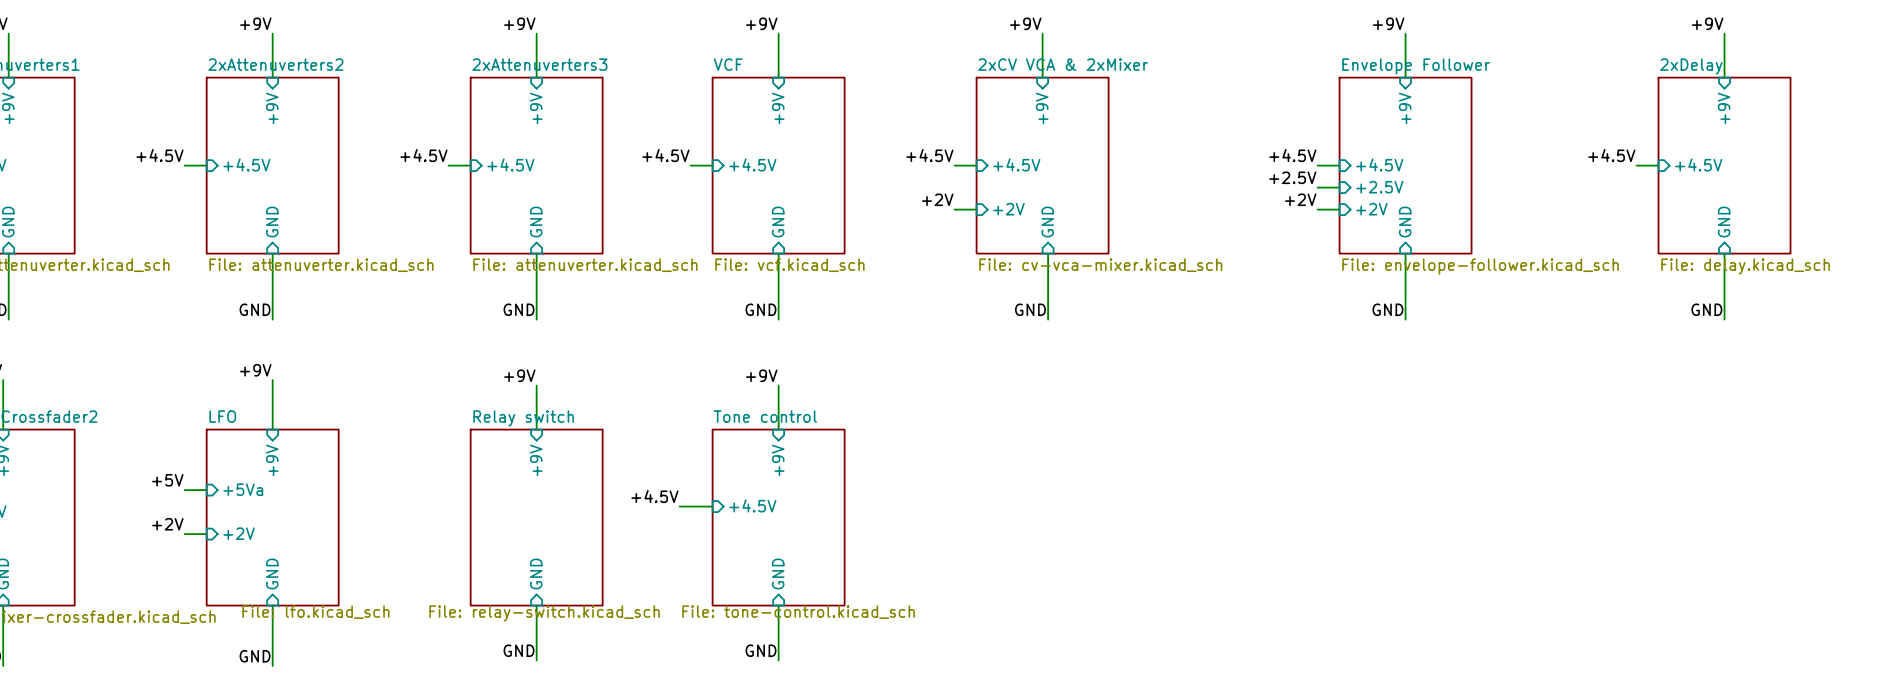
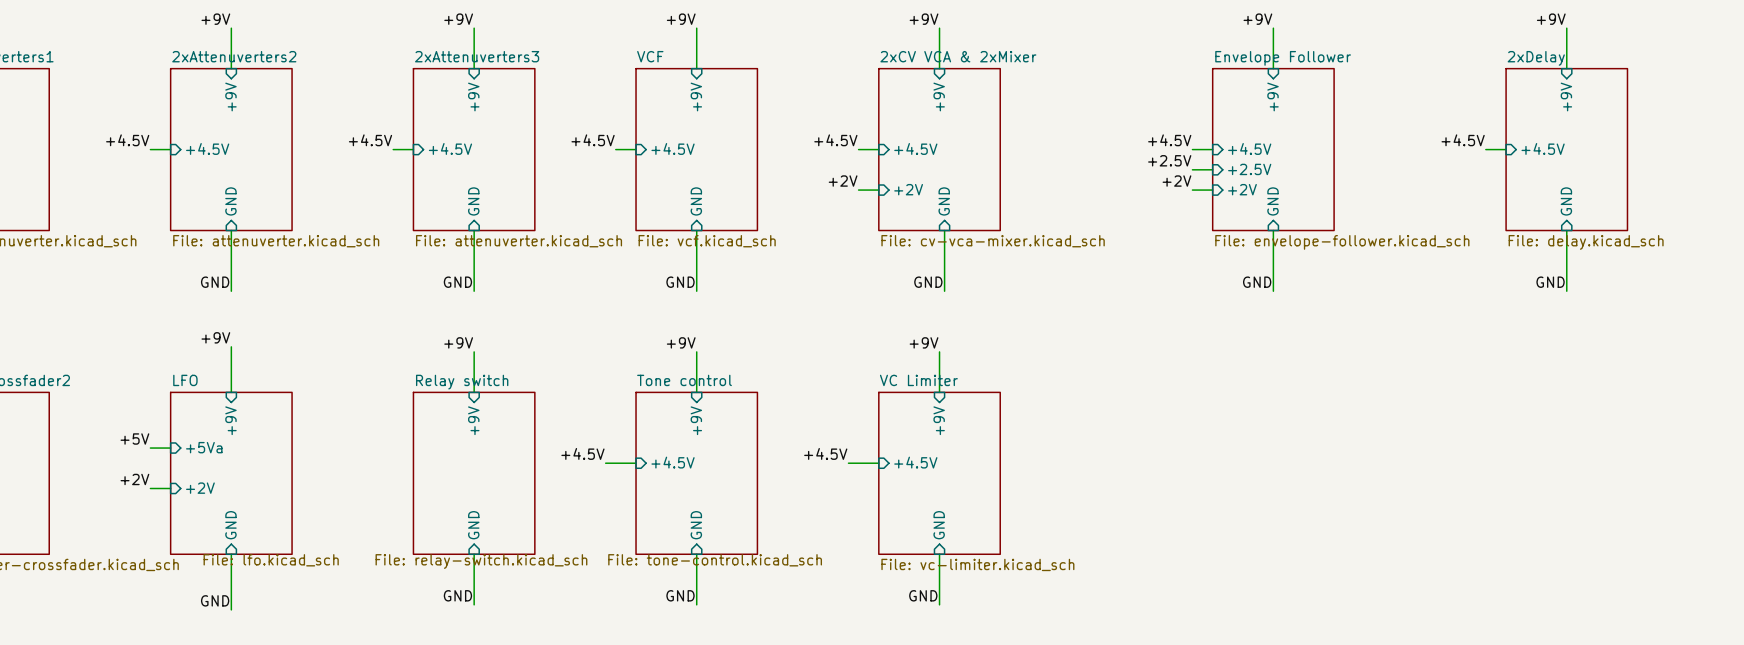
label: none -> +9V (924, 342)
wire: none -> (939, 351) (939, 392)
sheet pin: none -> +9V (939, 420)
label: none -> +4.5V (825, 453)
sheet pin: none -> +4.5V (915, 462)
wire: none -> (848, 463) (878, 463)
sheet VC Limiter: none -> File: vc-limiter.kicad_sch (939, 473)
sheet pin: none -> GND (939, 525)
wire: none -> (939, 554) (939, 604)
label: none -> GND (923, 595)

